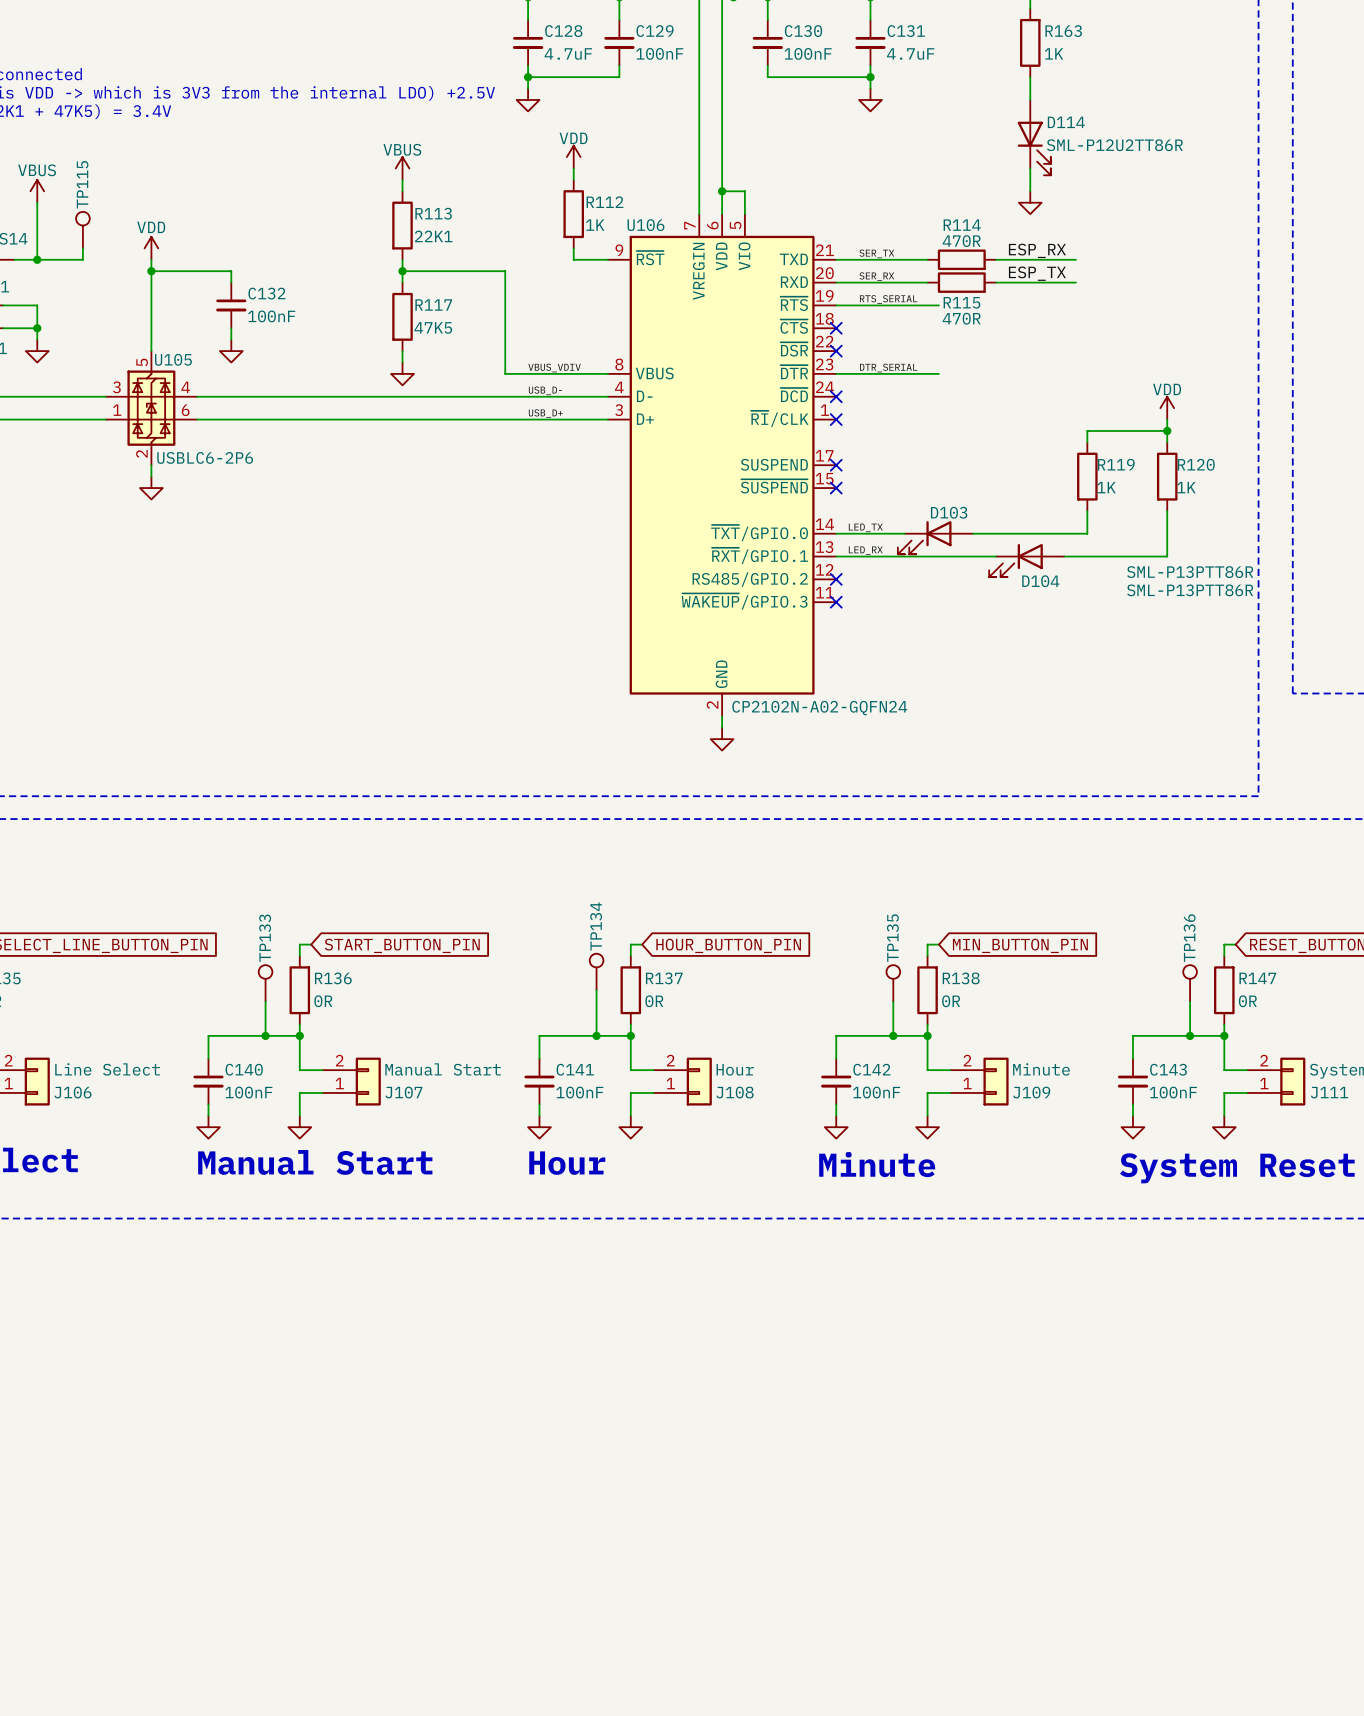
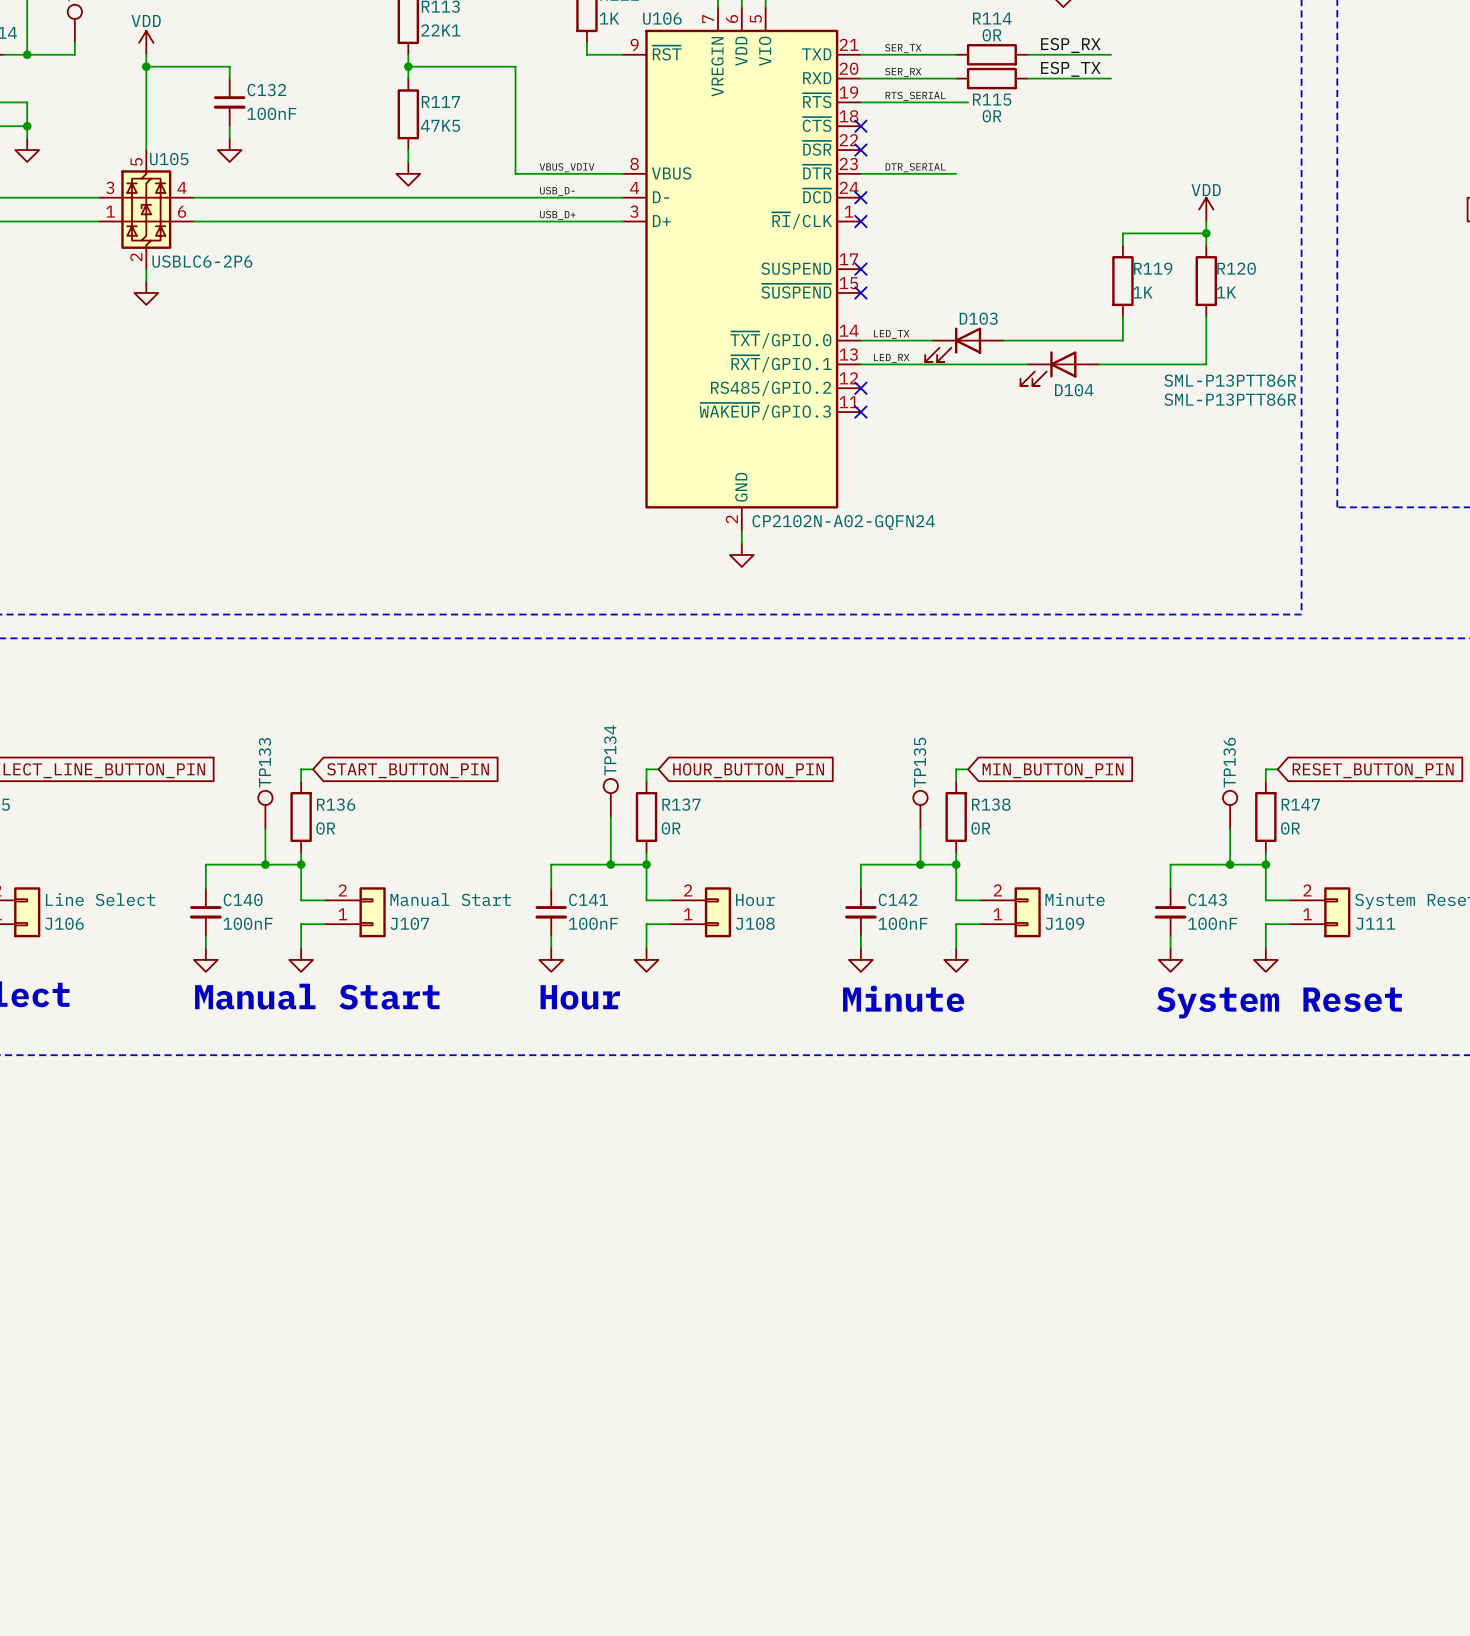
R114 value: 470R (961, 241) -> 0R (991, 35)
R115 value: 470R (961, 318) -> 0R (991, 116)
wire: (927, 373) (938, 373) -> none

